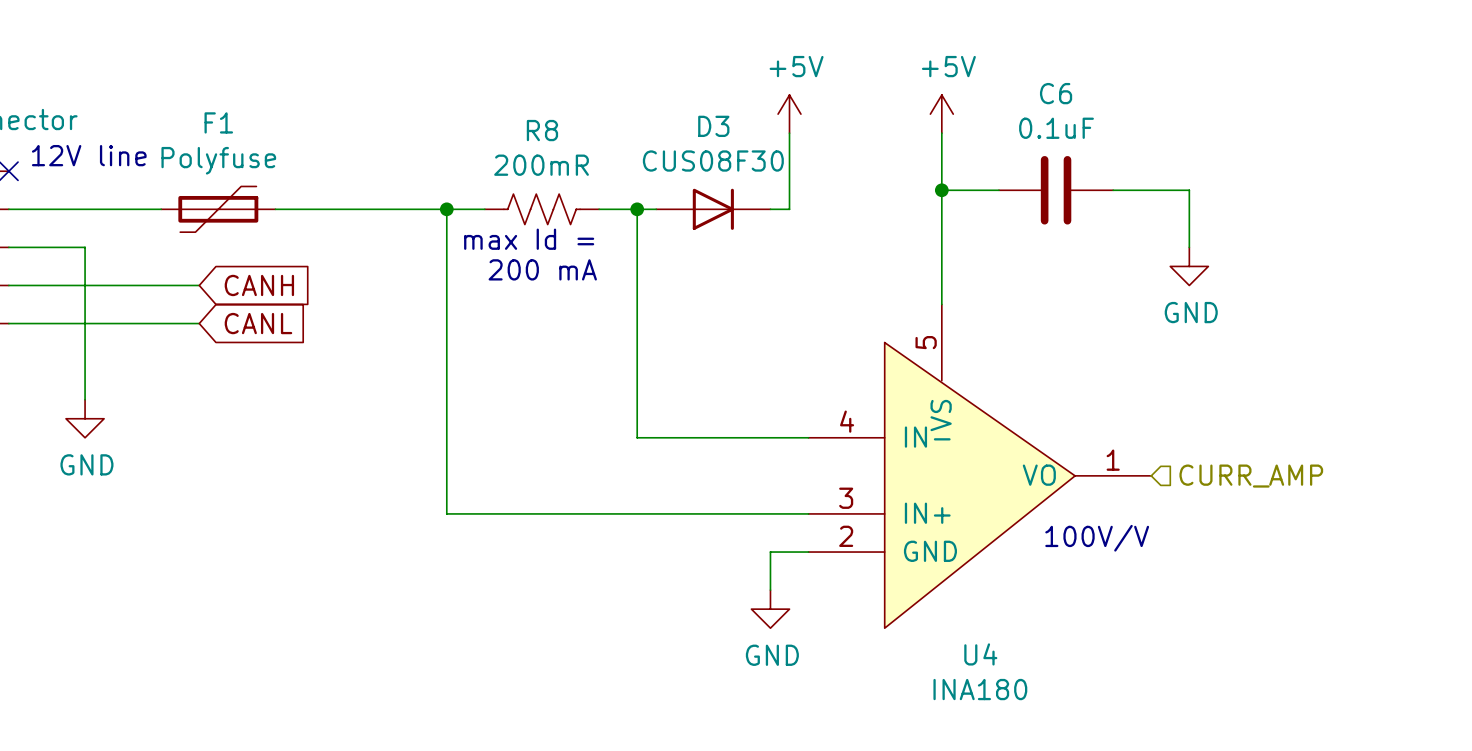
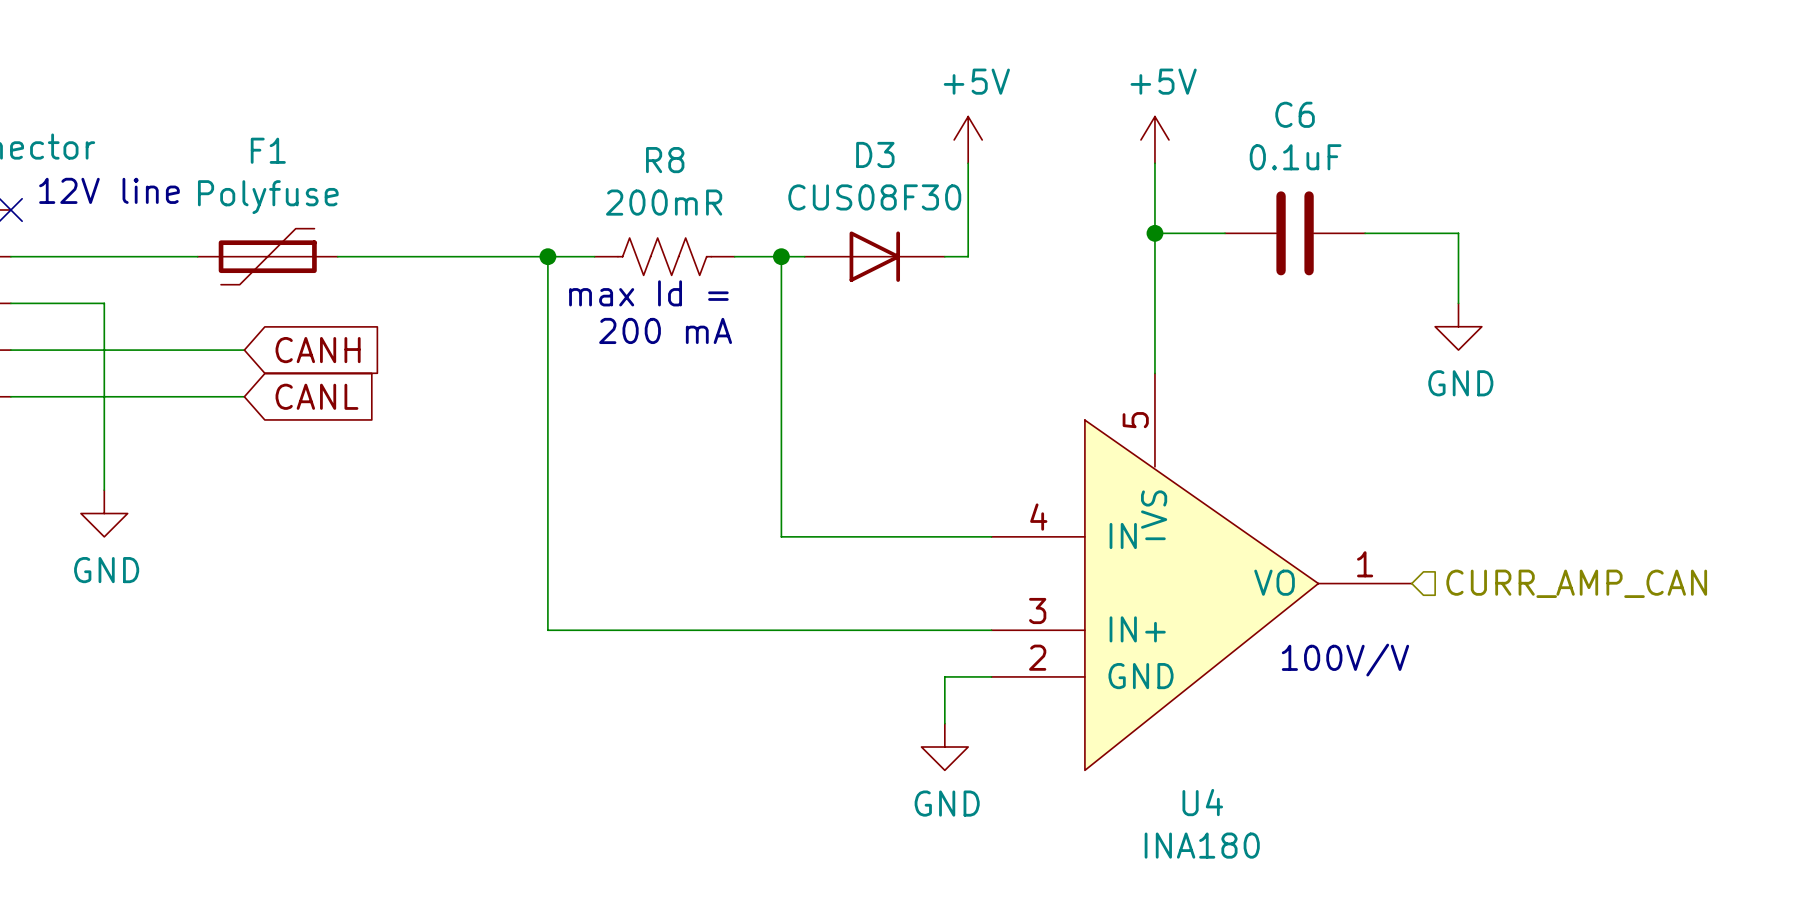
hierarchical label: CURR_AMP (1251, 476) -> CURR_AMP_CAN (1576, 583)

